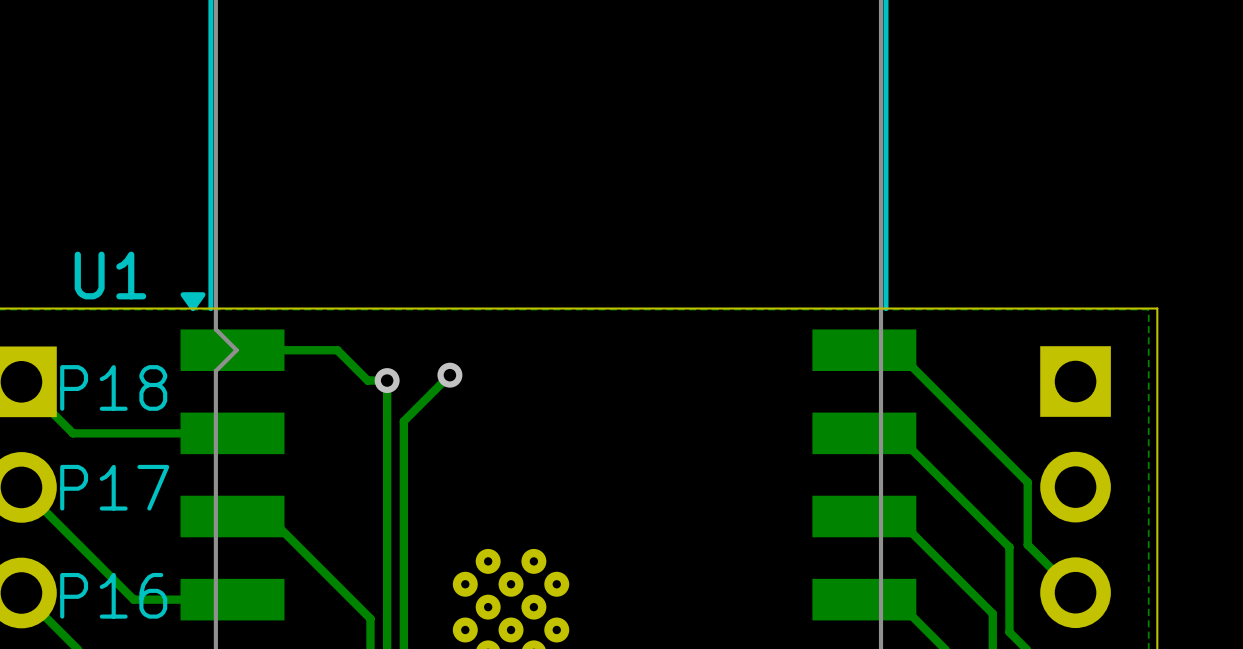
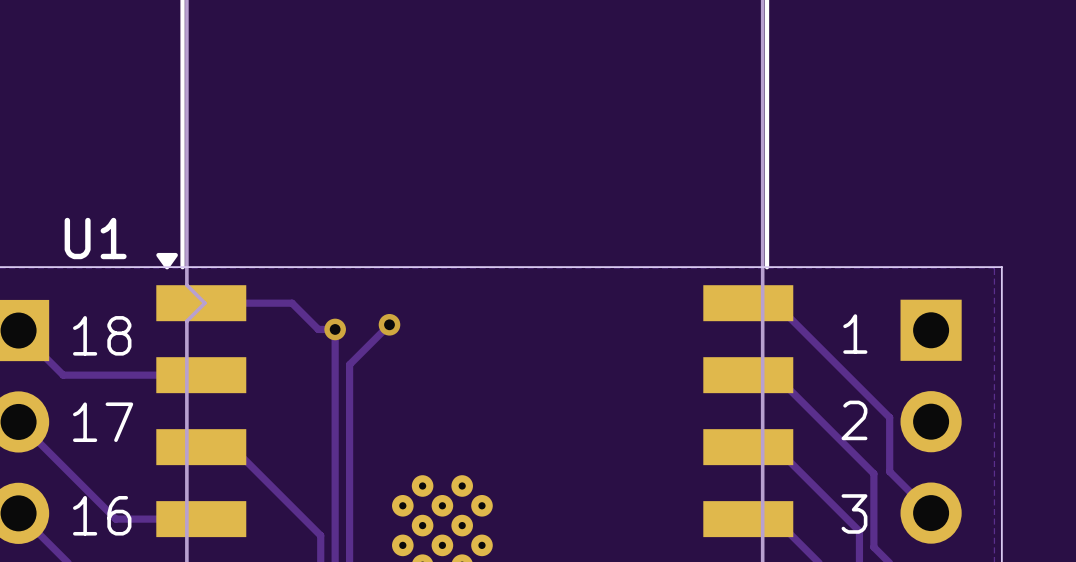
text: none -> 1 (855, 334)
text: P18 (113, 387) -> 18 (102, 335)
text: none -> 2 (854, 420)
text: P17 (114, 487) -> 17 (103, 422)
text: none -> 3 (854, 513)
text: P16 (113, 595) -> 16 (102, 515)

